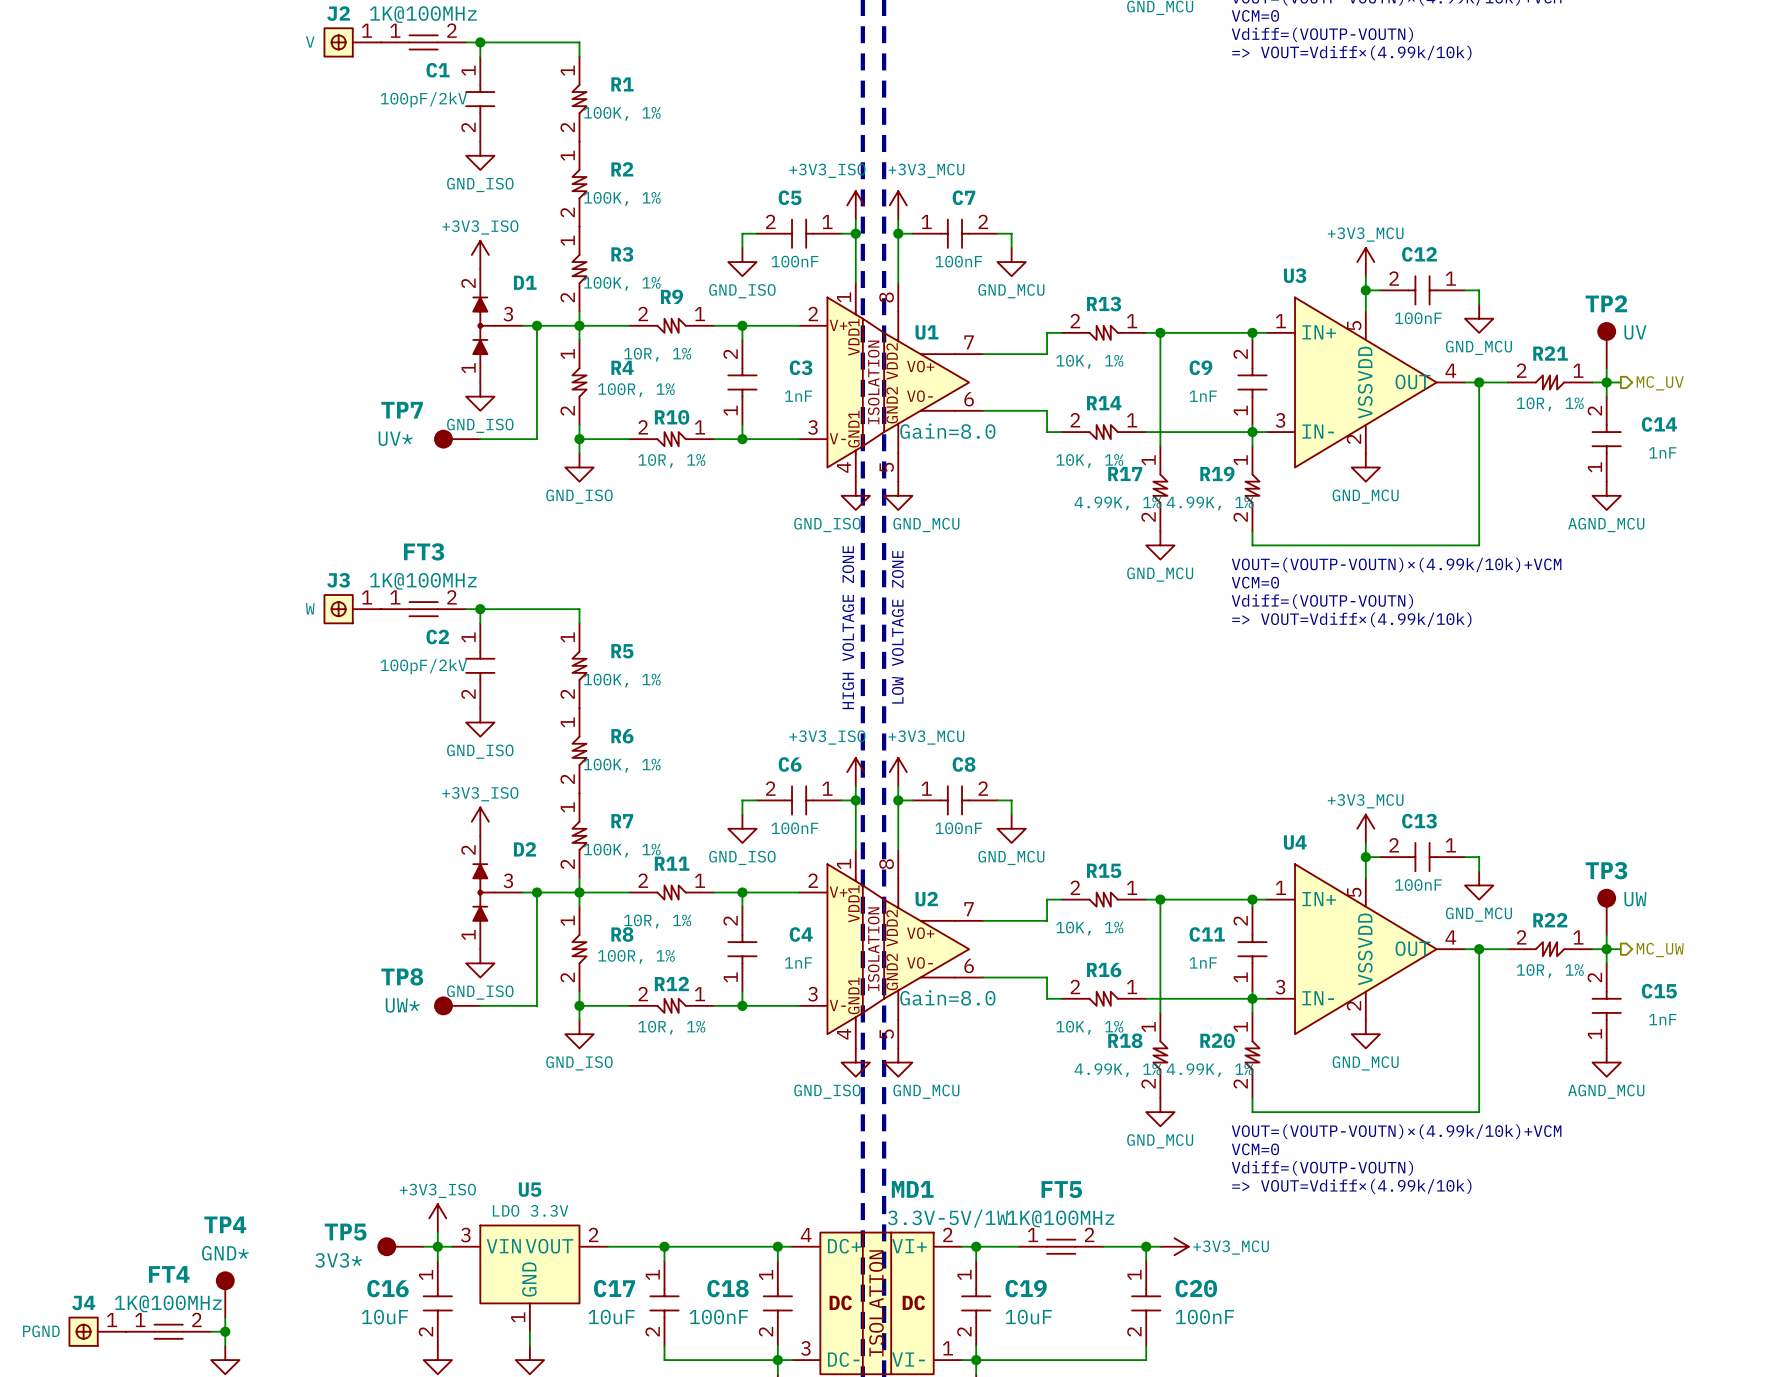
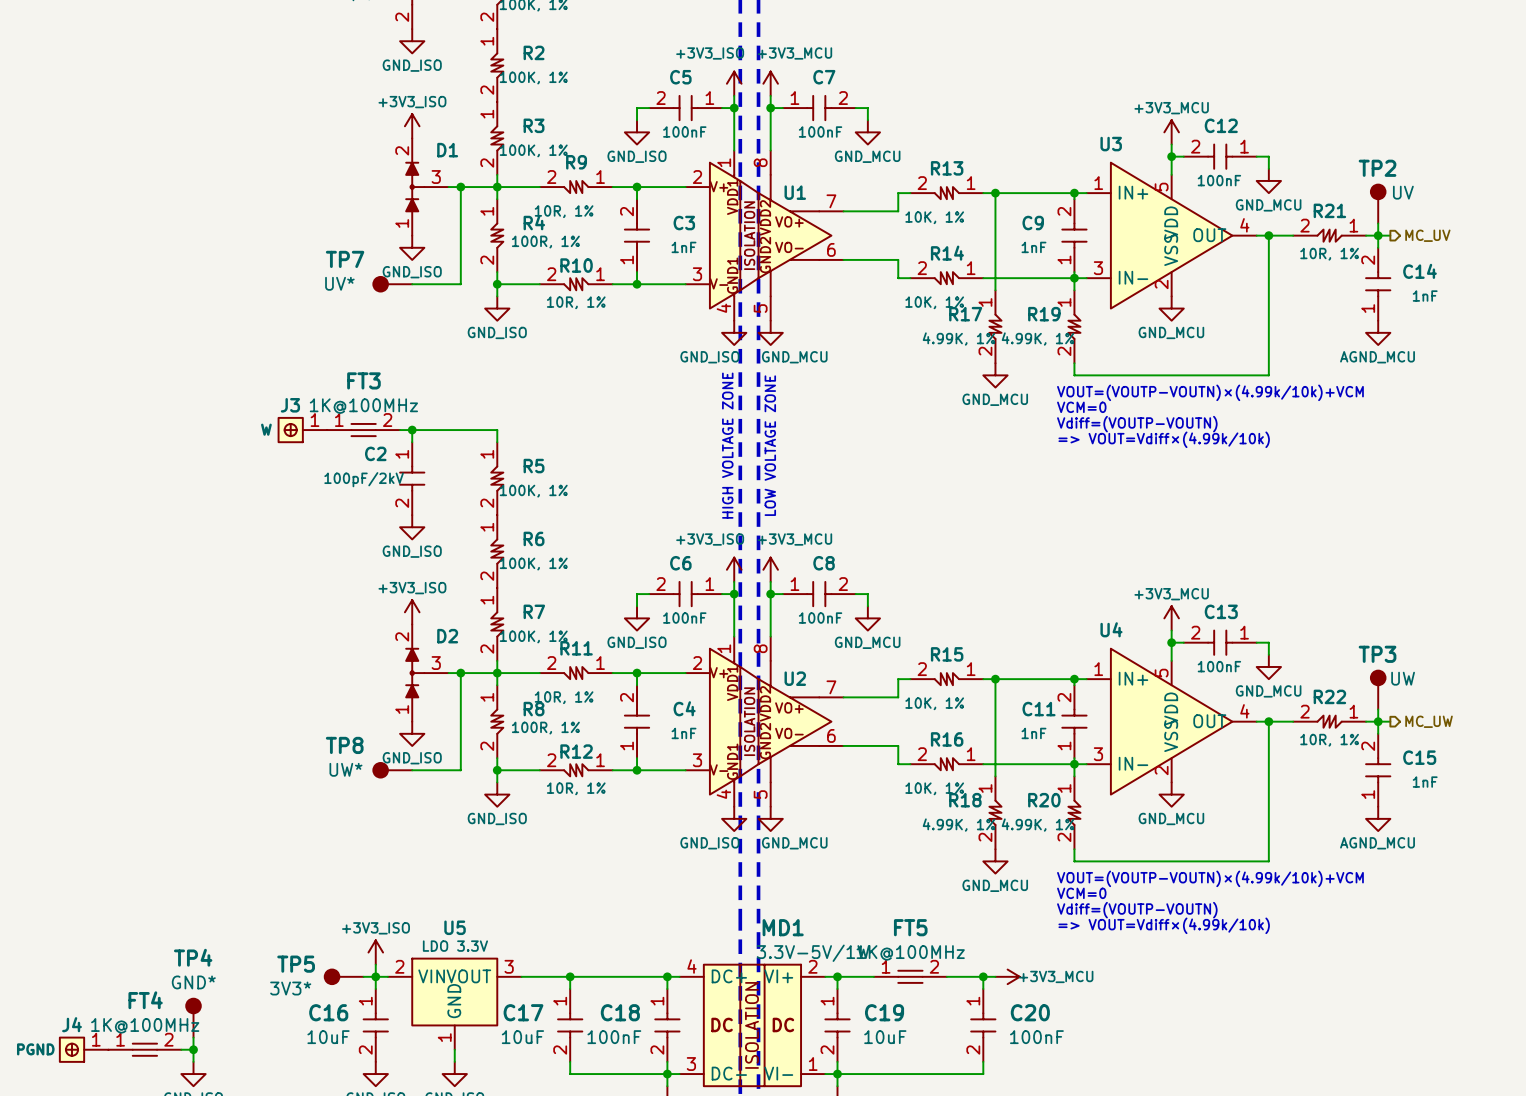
U1 text: Gain=8.0 (947, 431) -> none
U2 text: Gain=8.0 (947, 997) -> none
U5 pin number: 2 (593, 1234) -> 3 (509, 966)
U5 pin number: 3 (465, 1235) -> 2 (399, 966)

